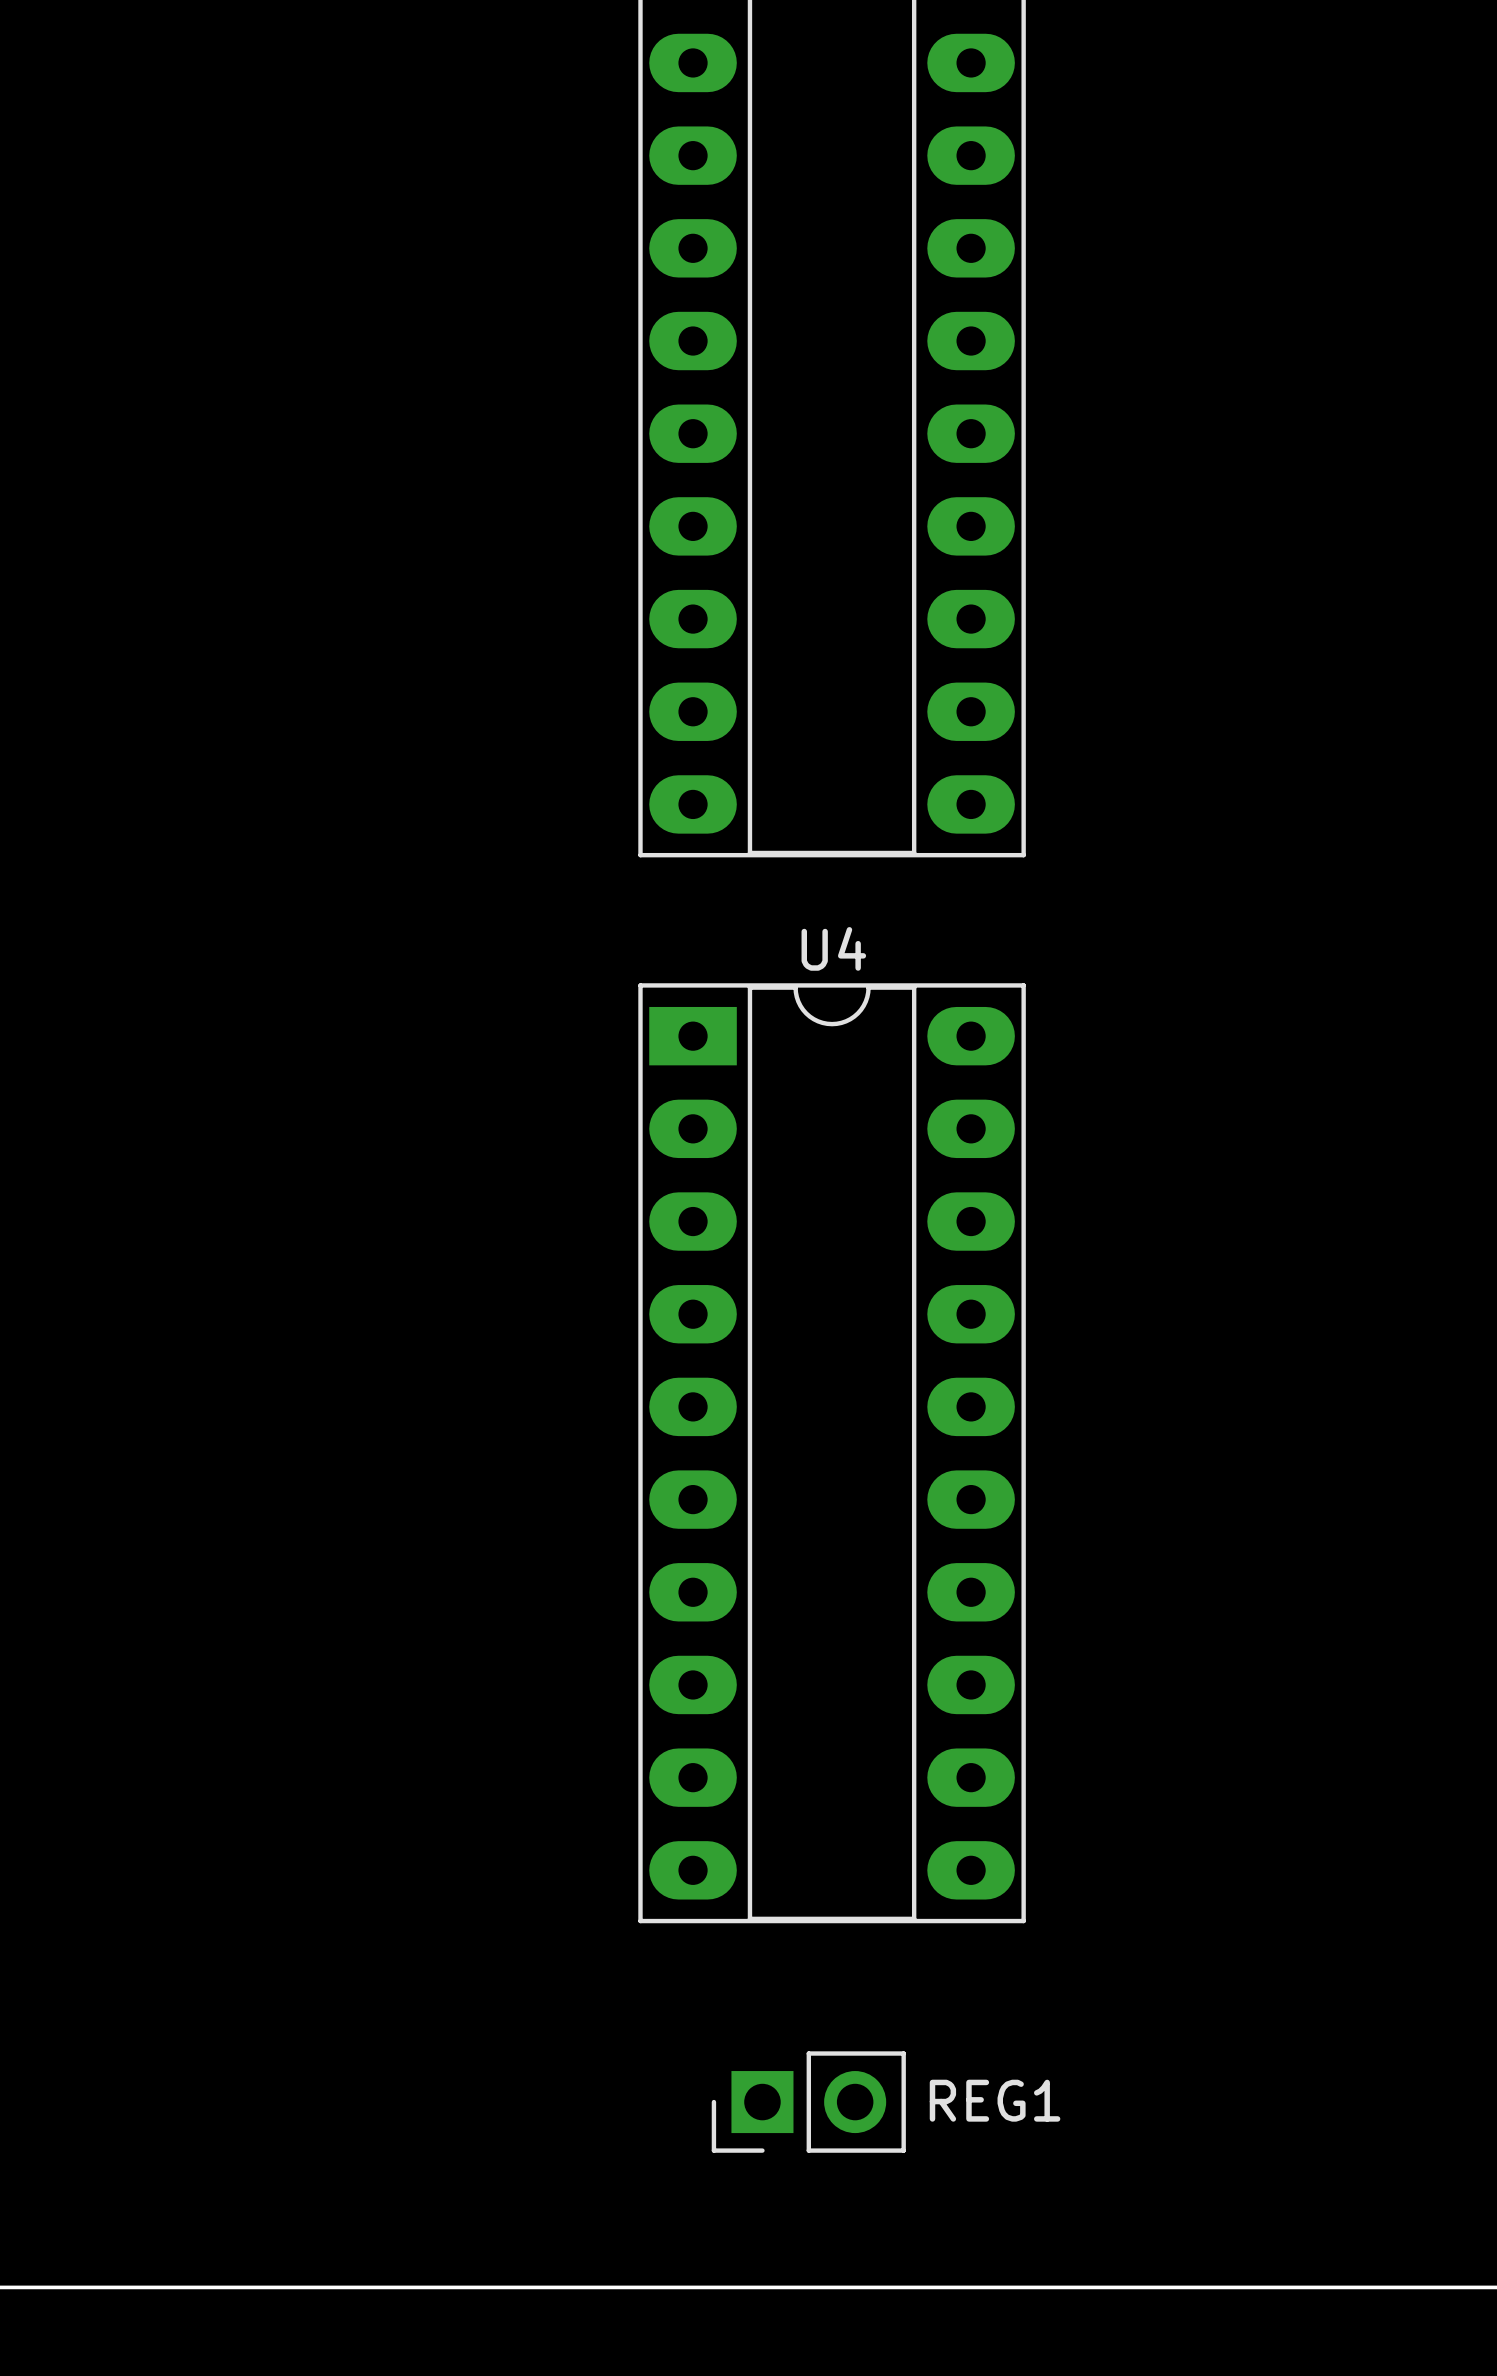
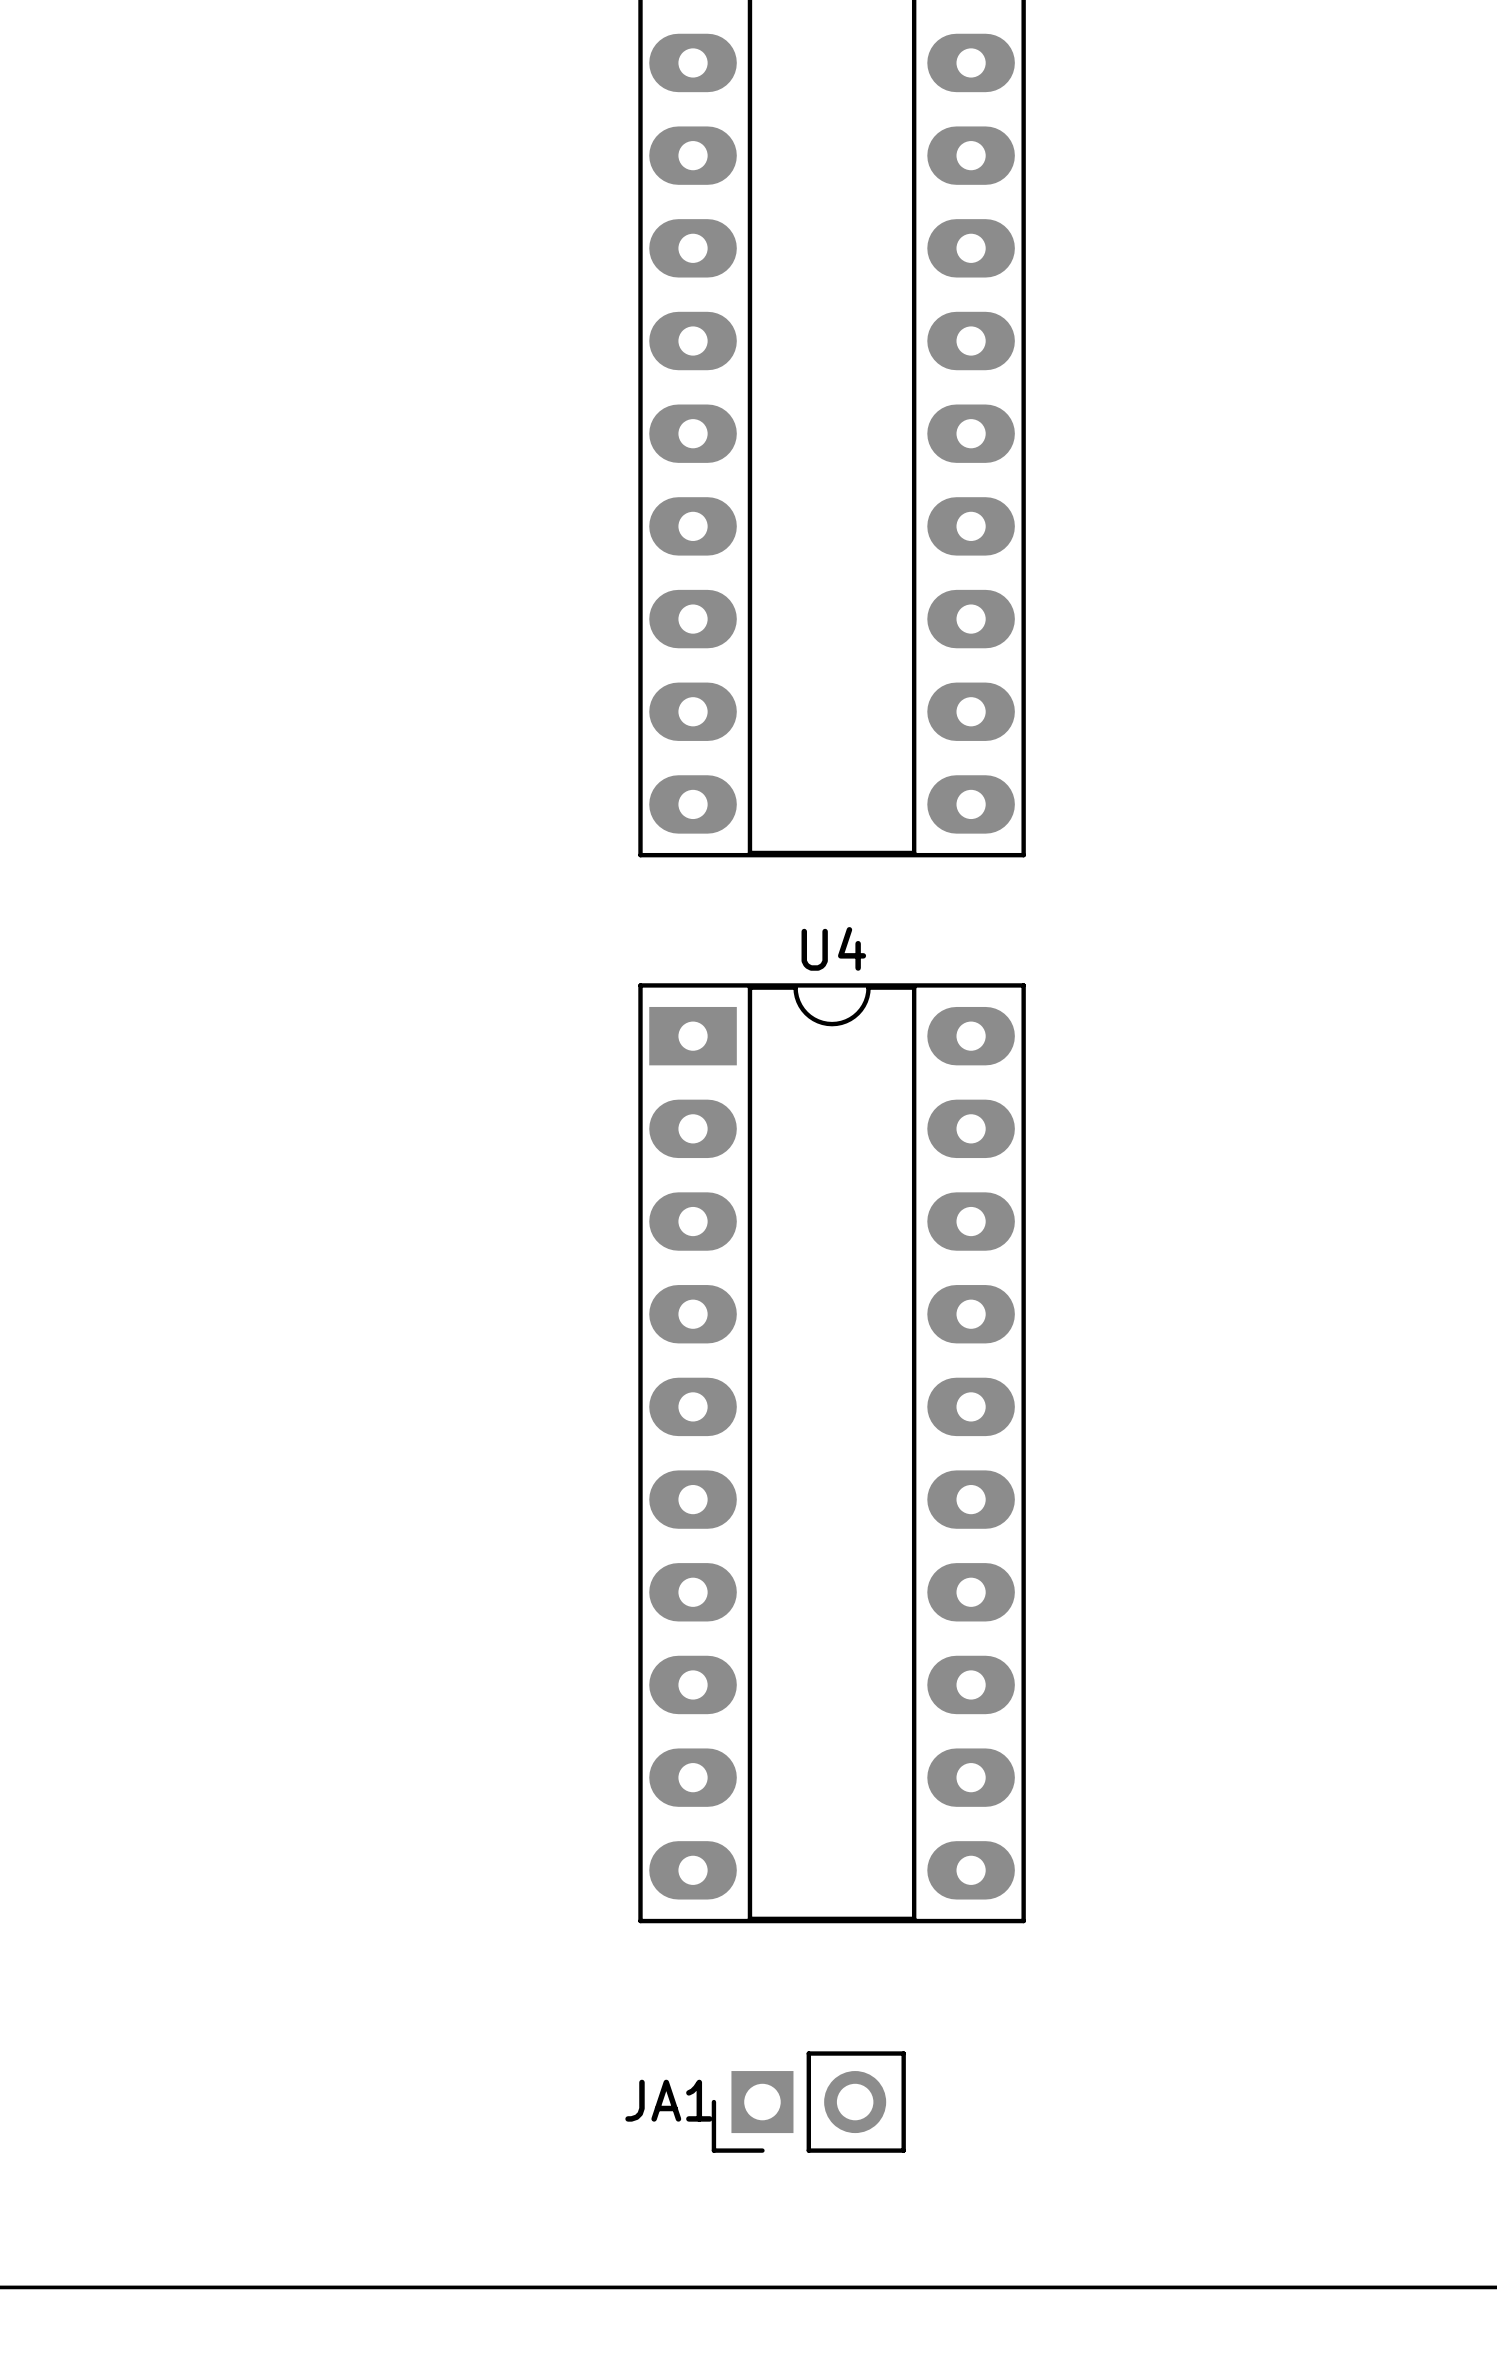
REG1 name: REG1 (995, 2100) -> JA1 (668, 2100)

